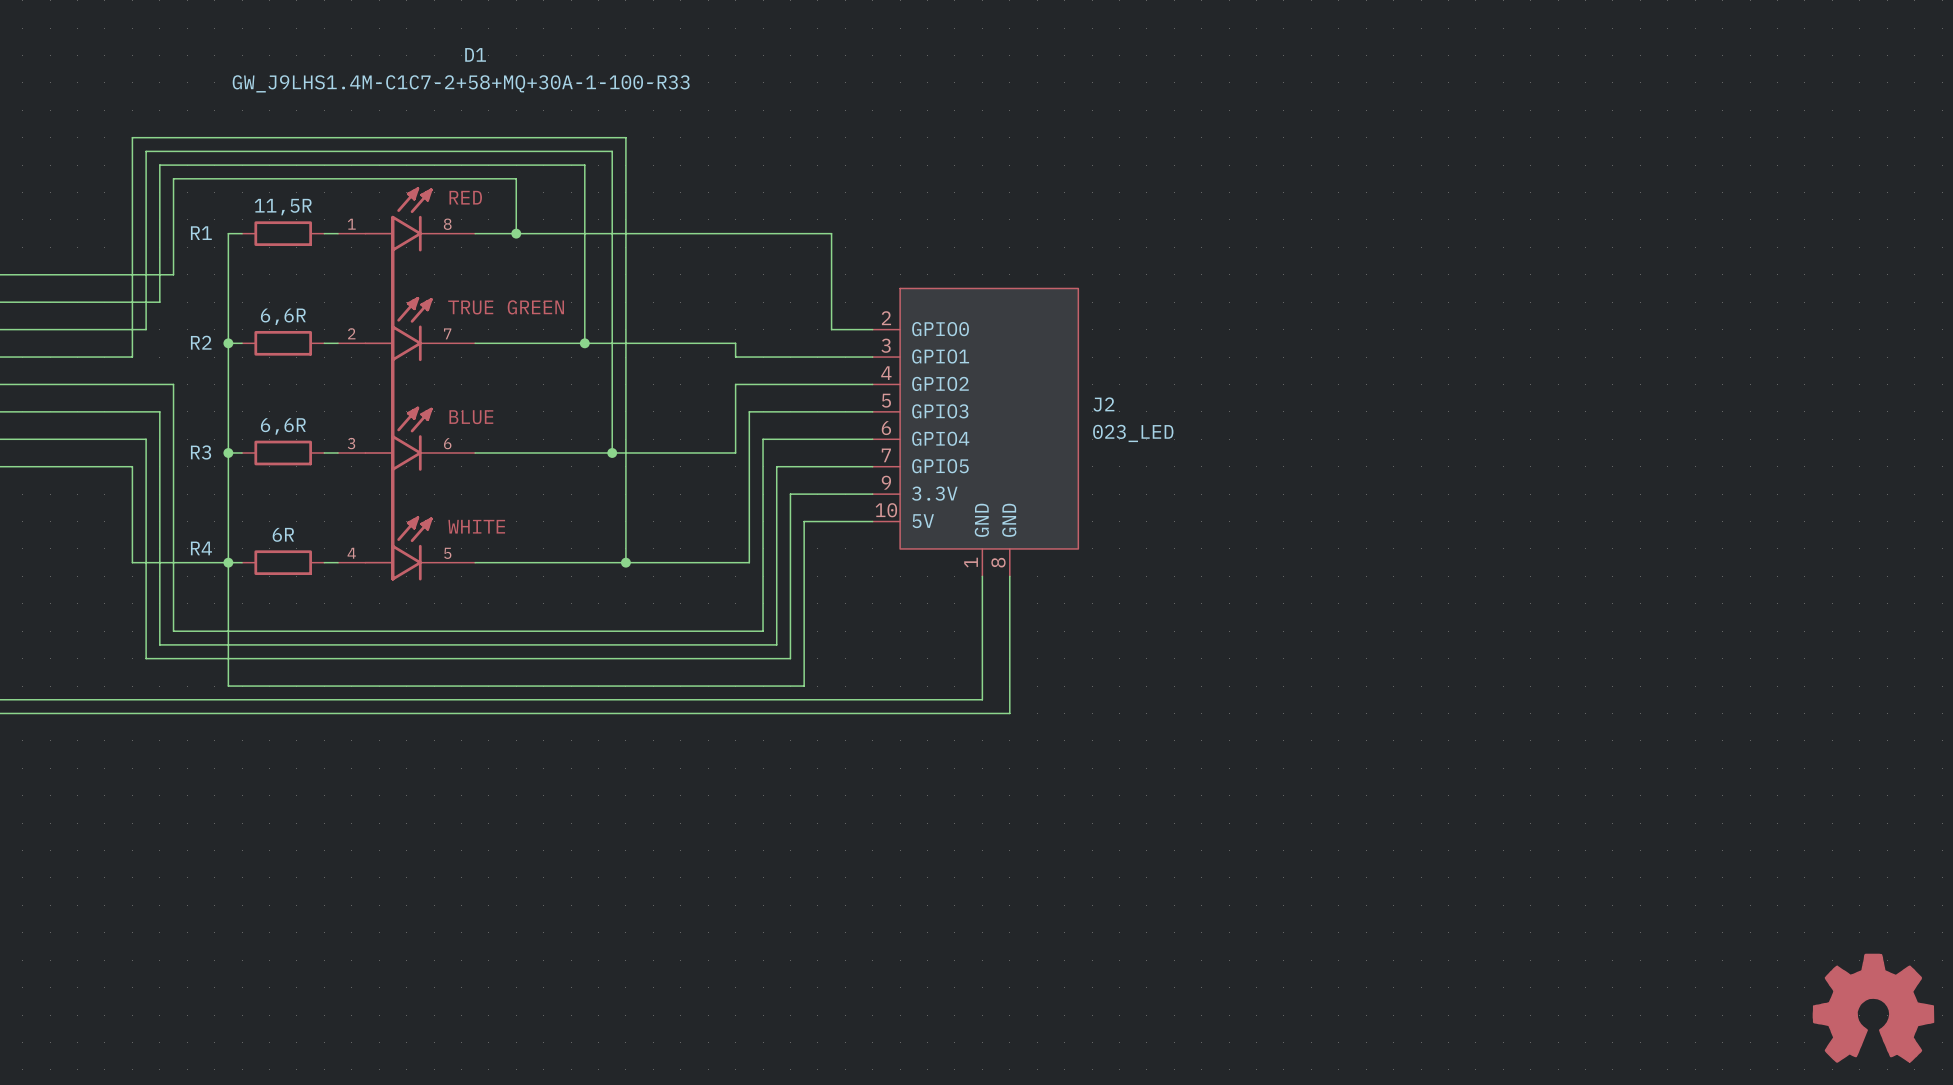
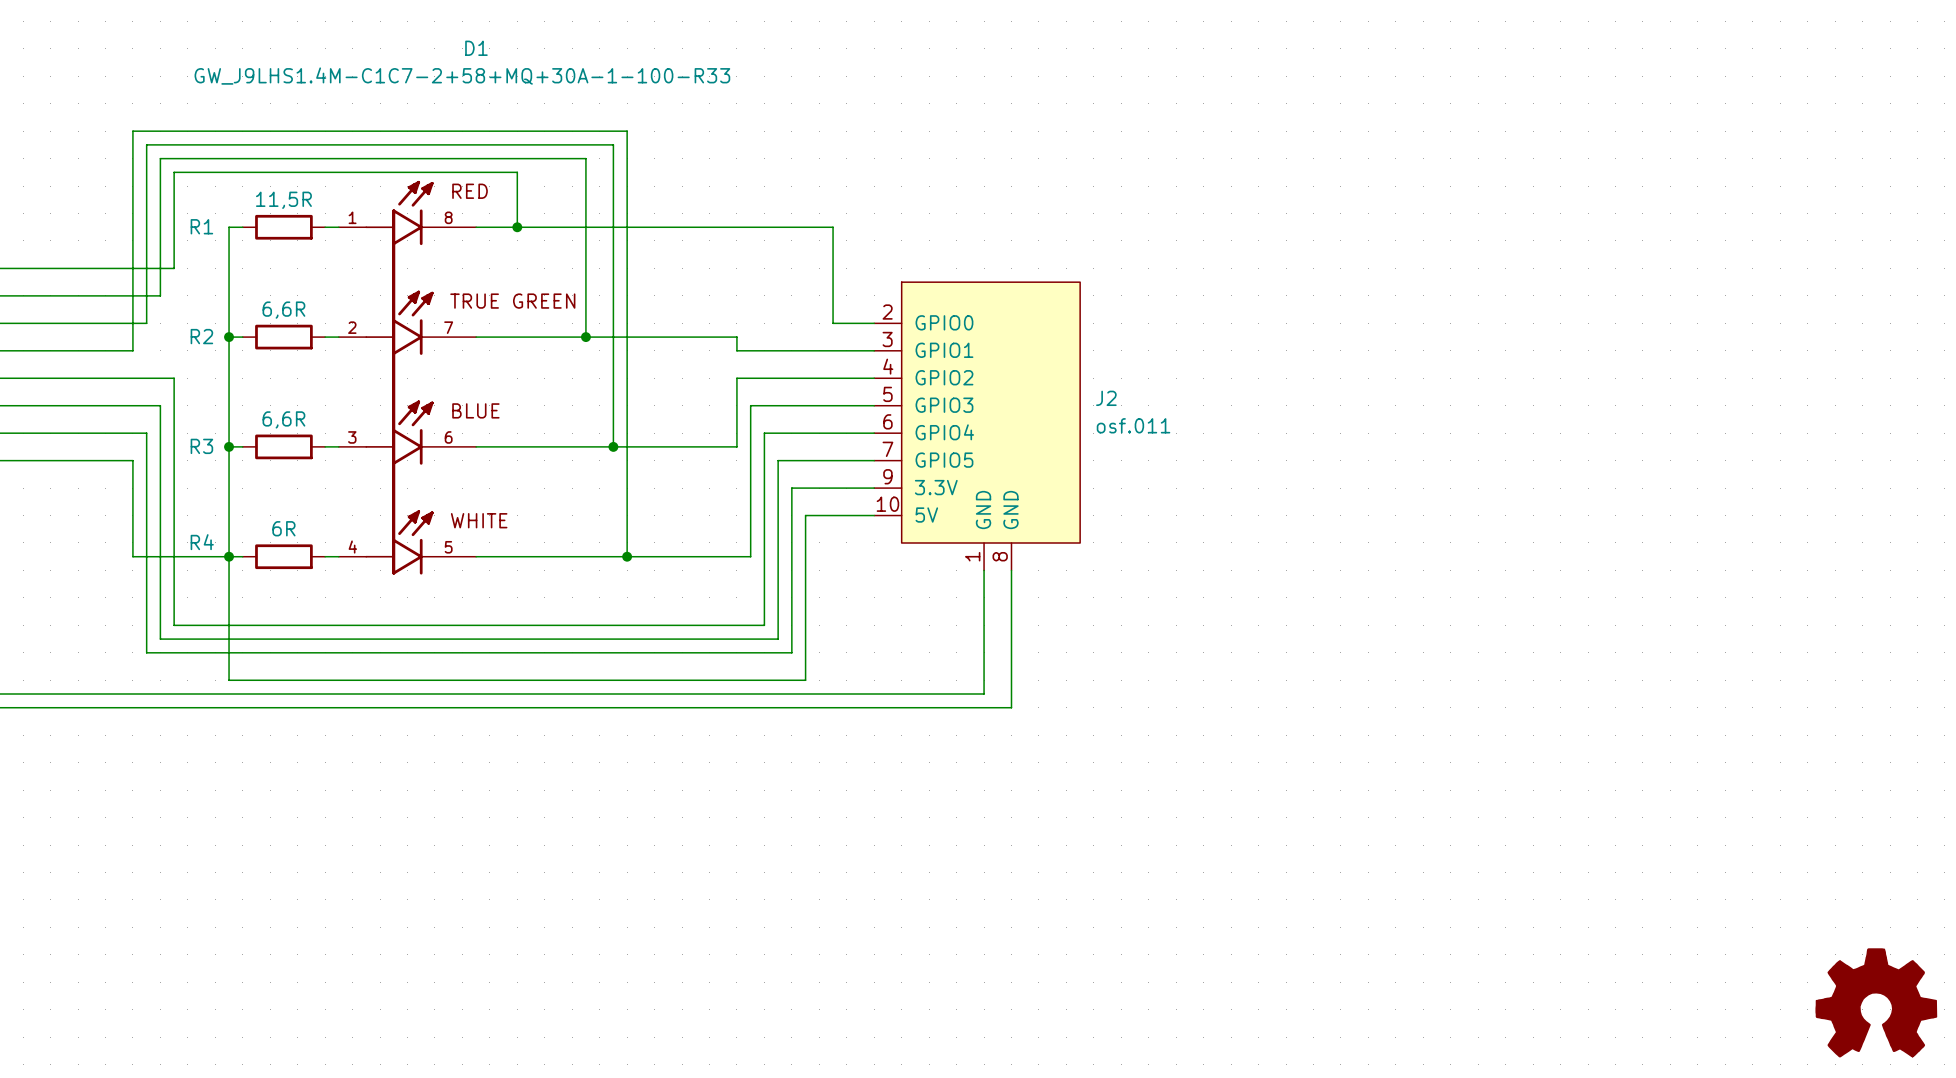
J2 value: 023_LED (1133, 433) -> osf.011 (1133, 425)

